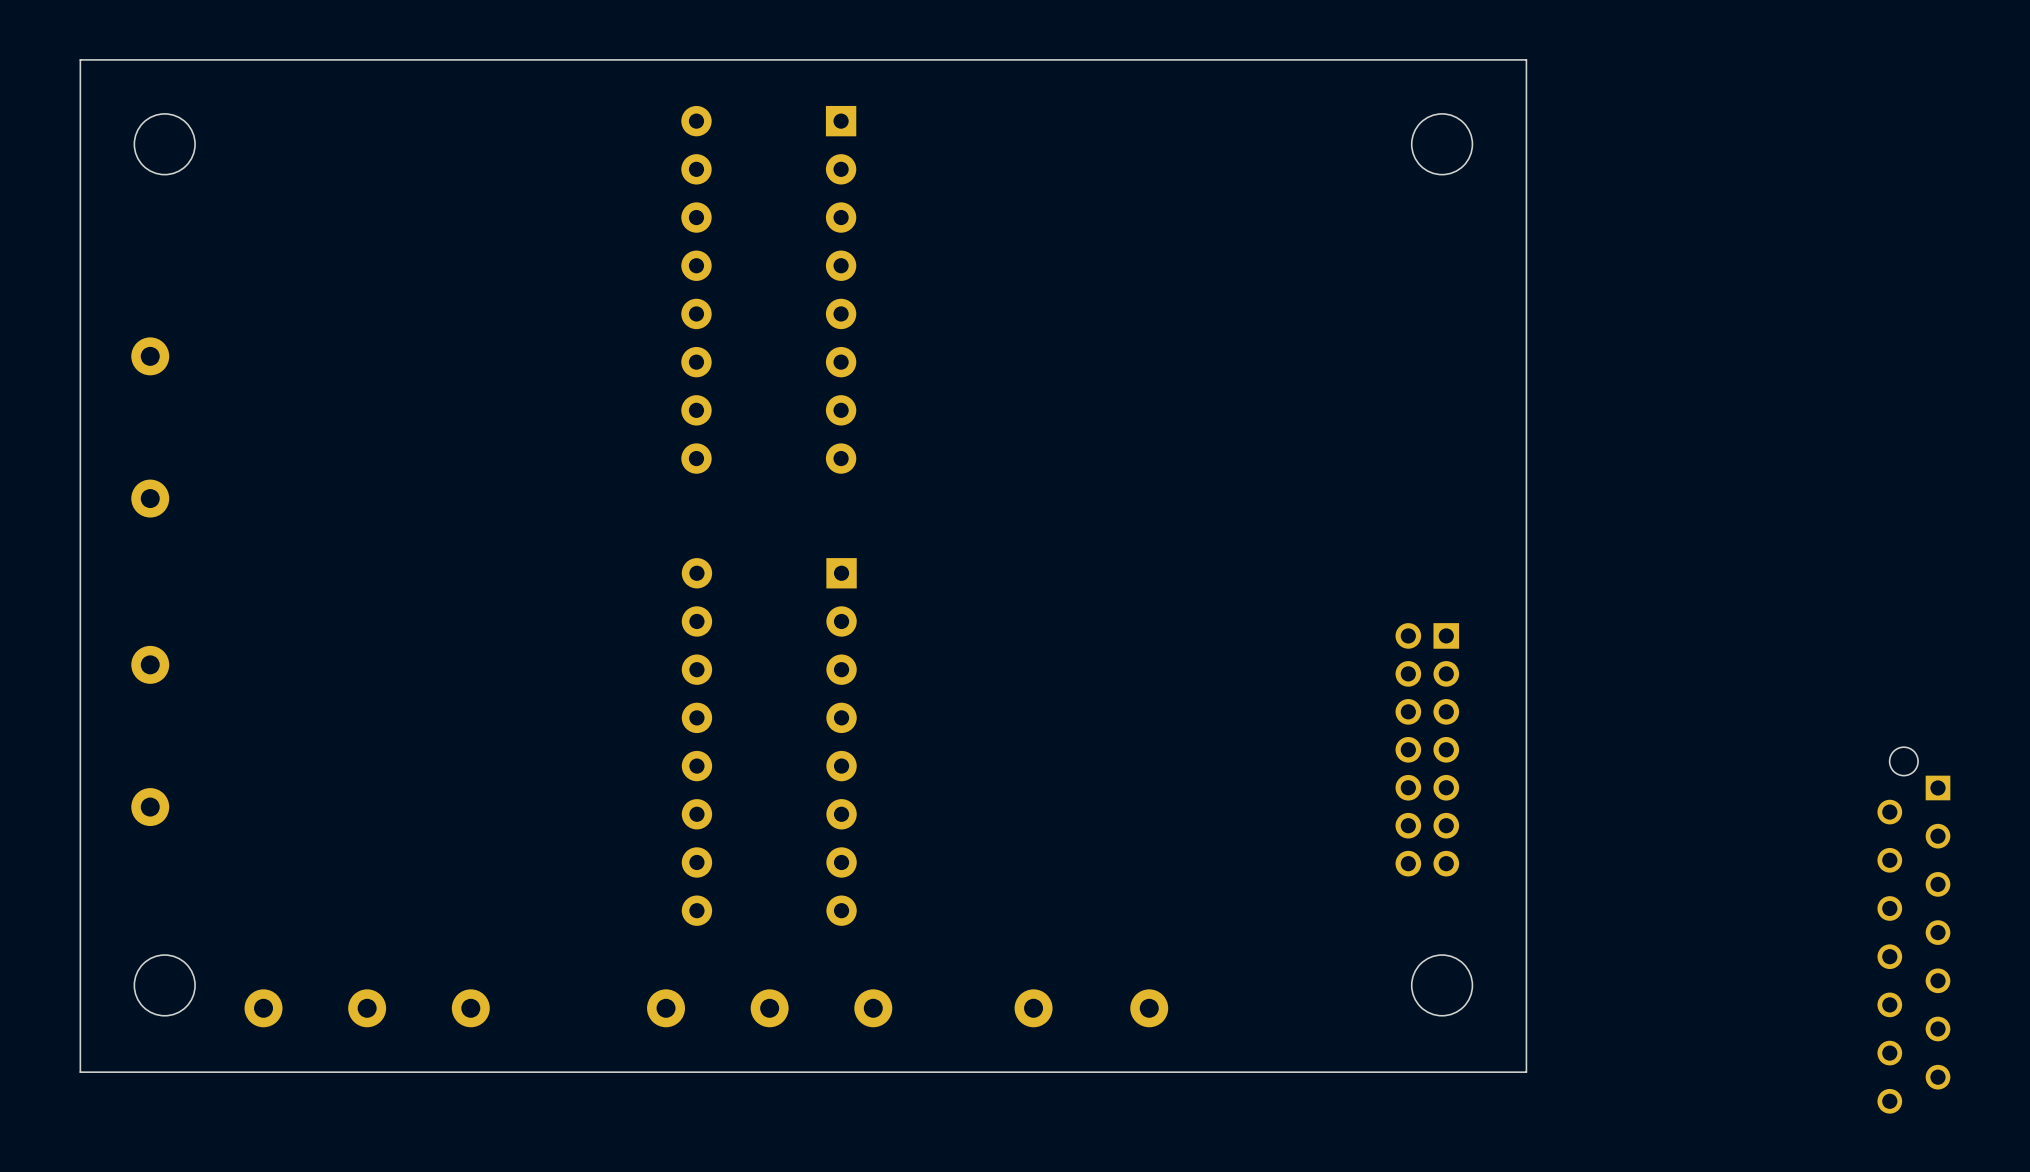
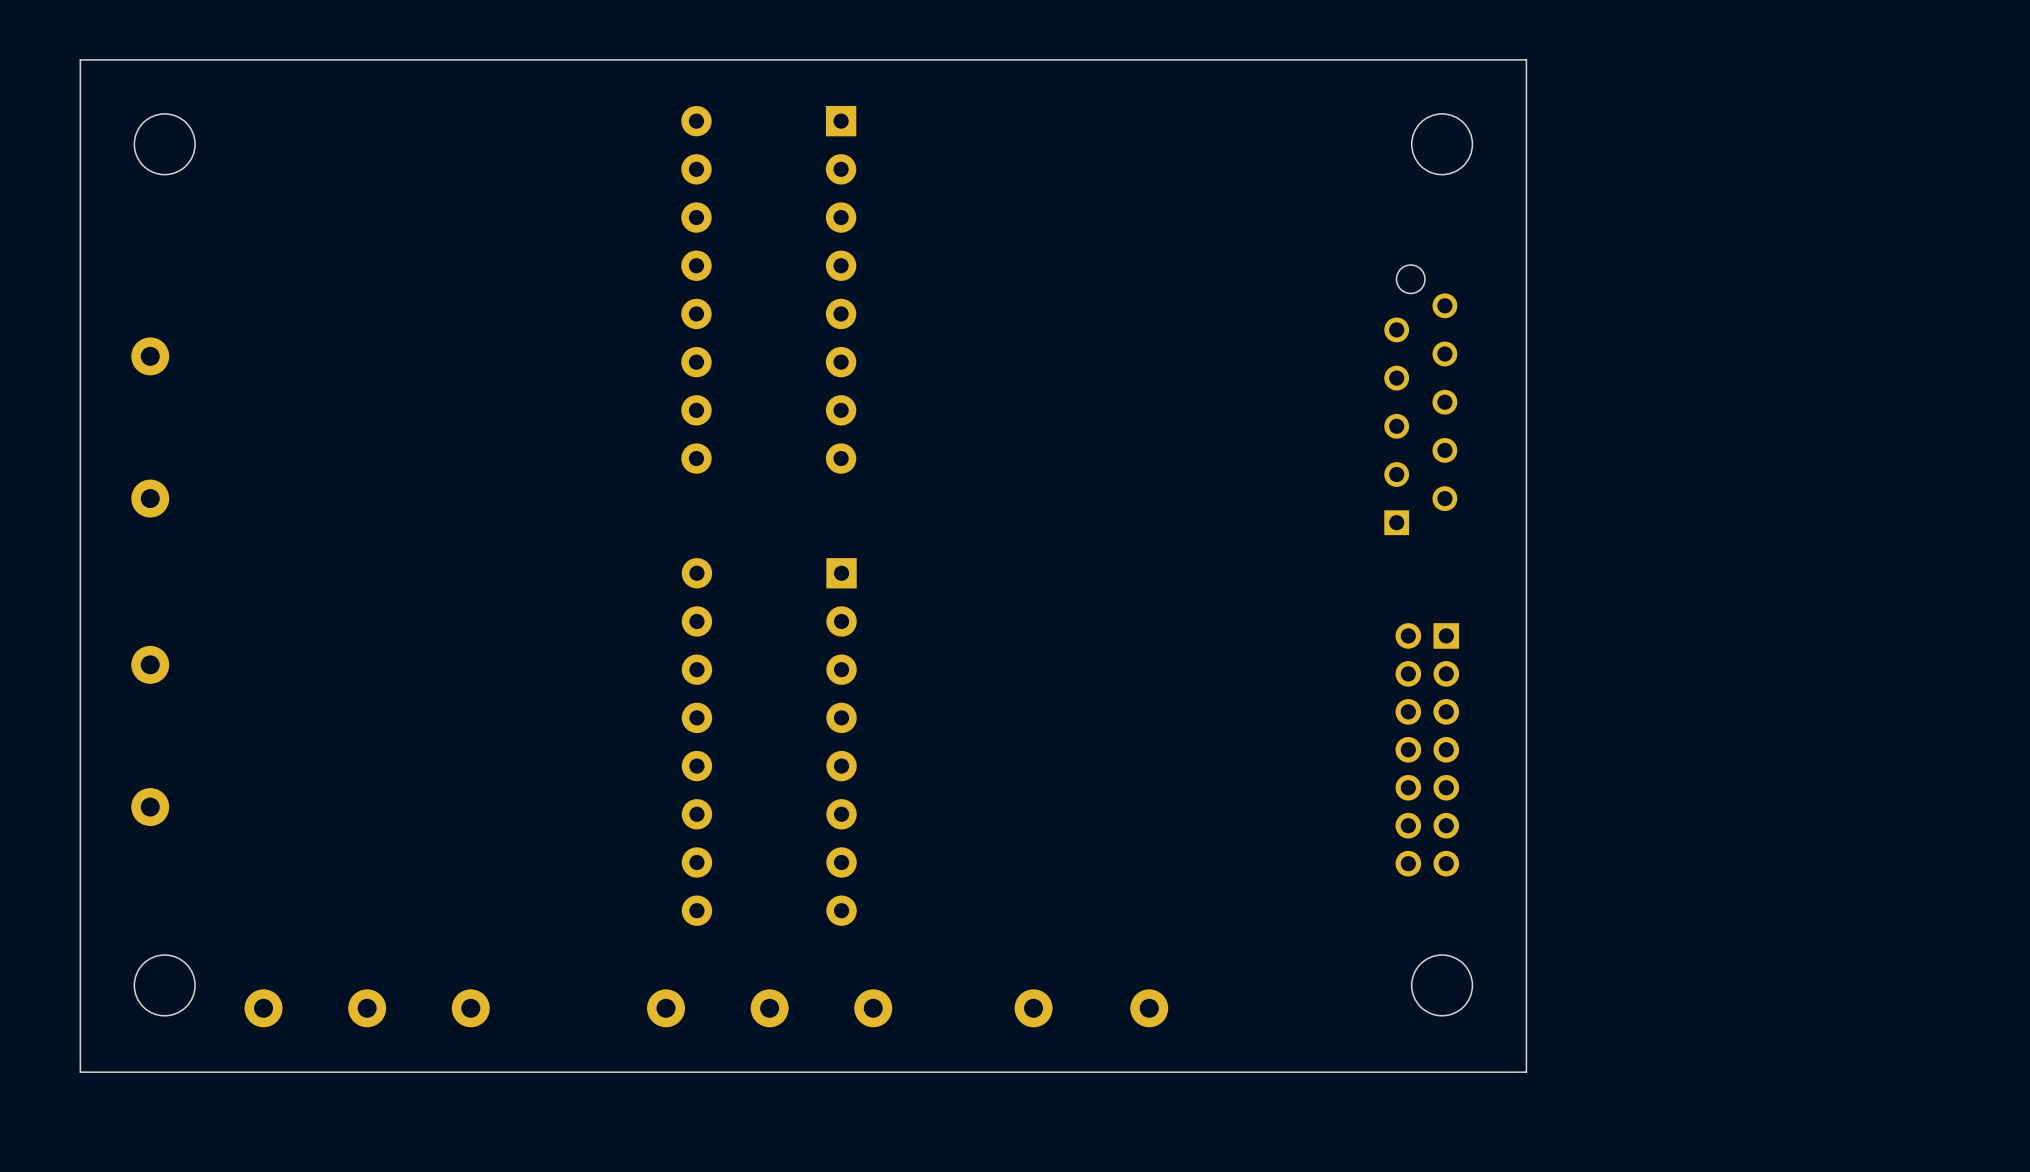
part: none -> (1420, 400)
part: (1913, 930) -> none

